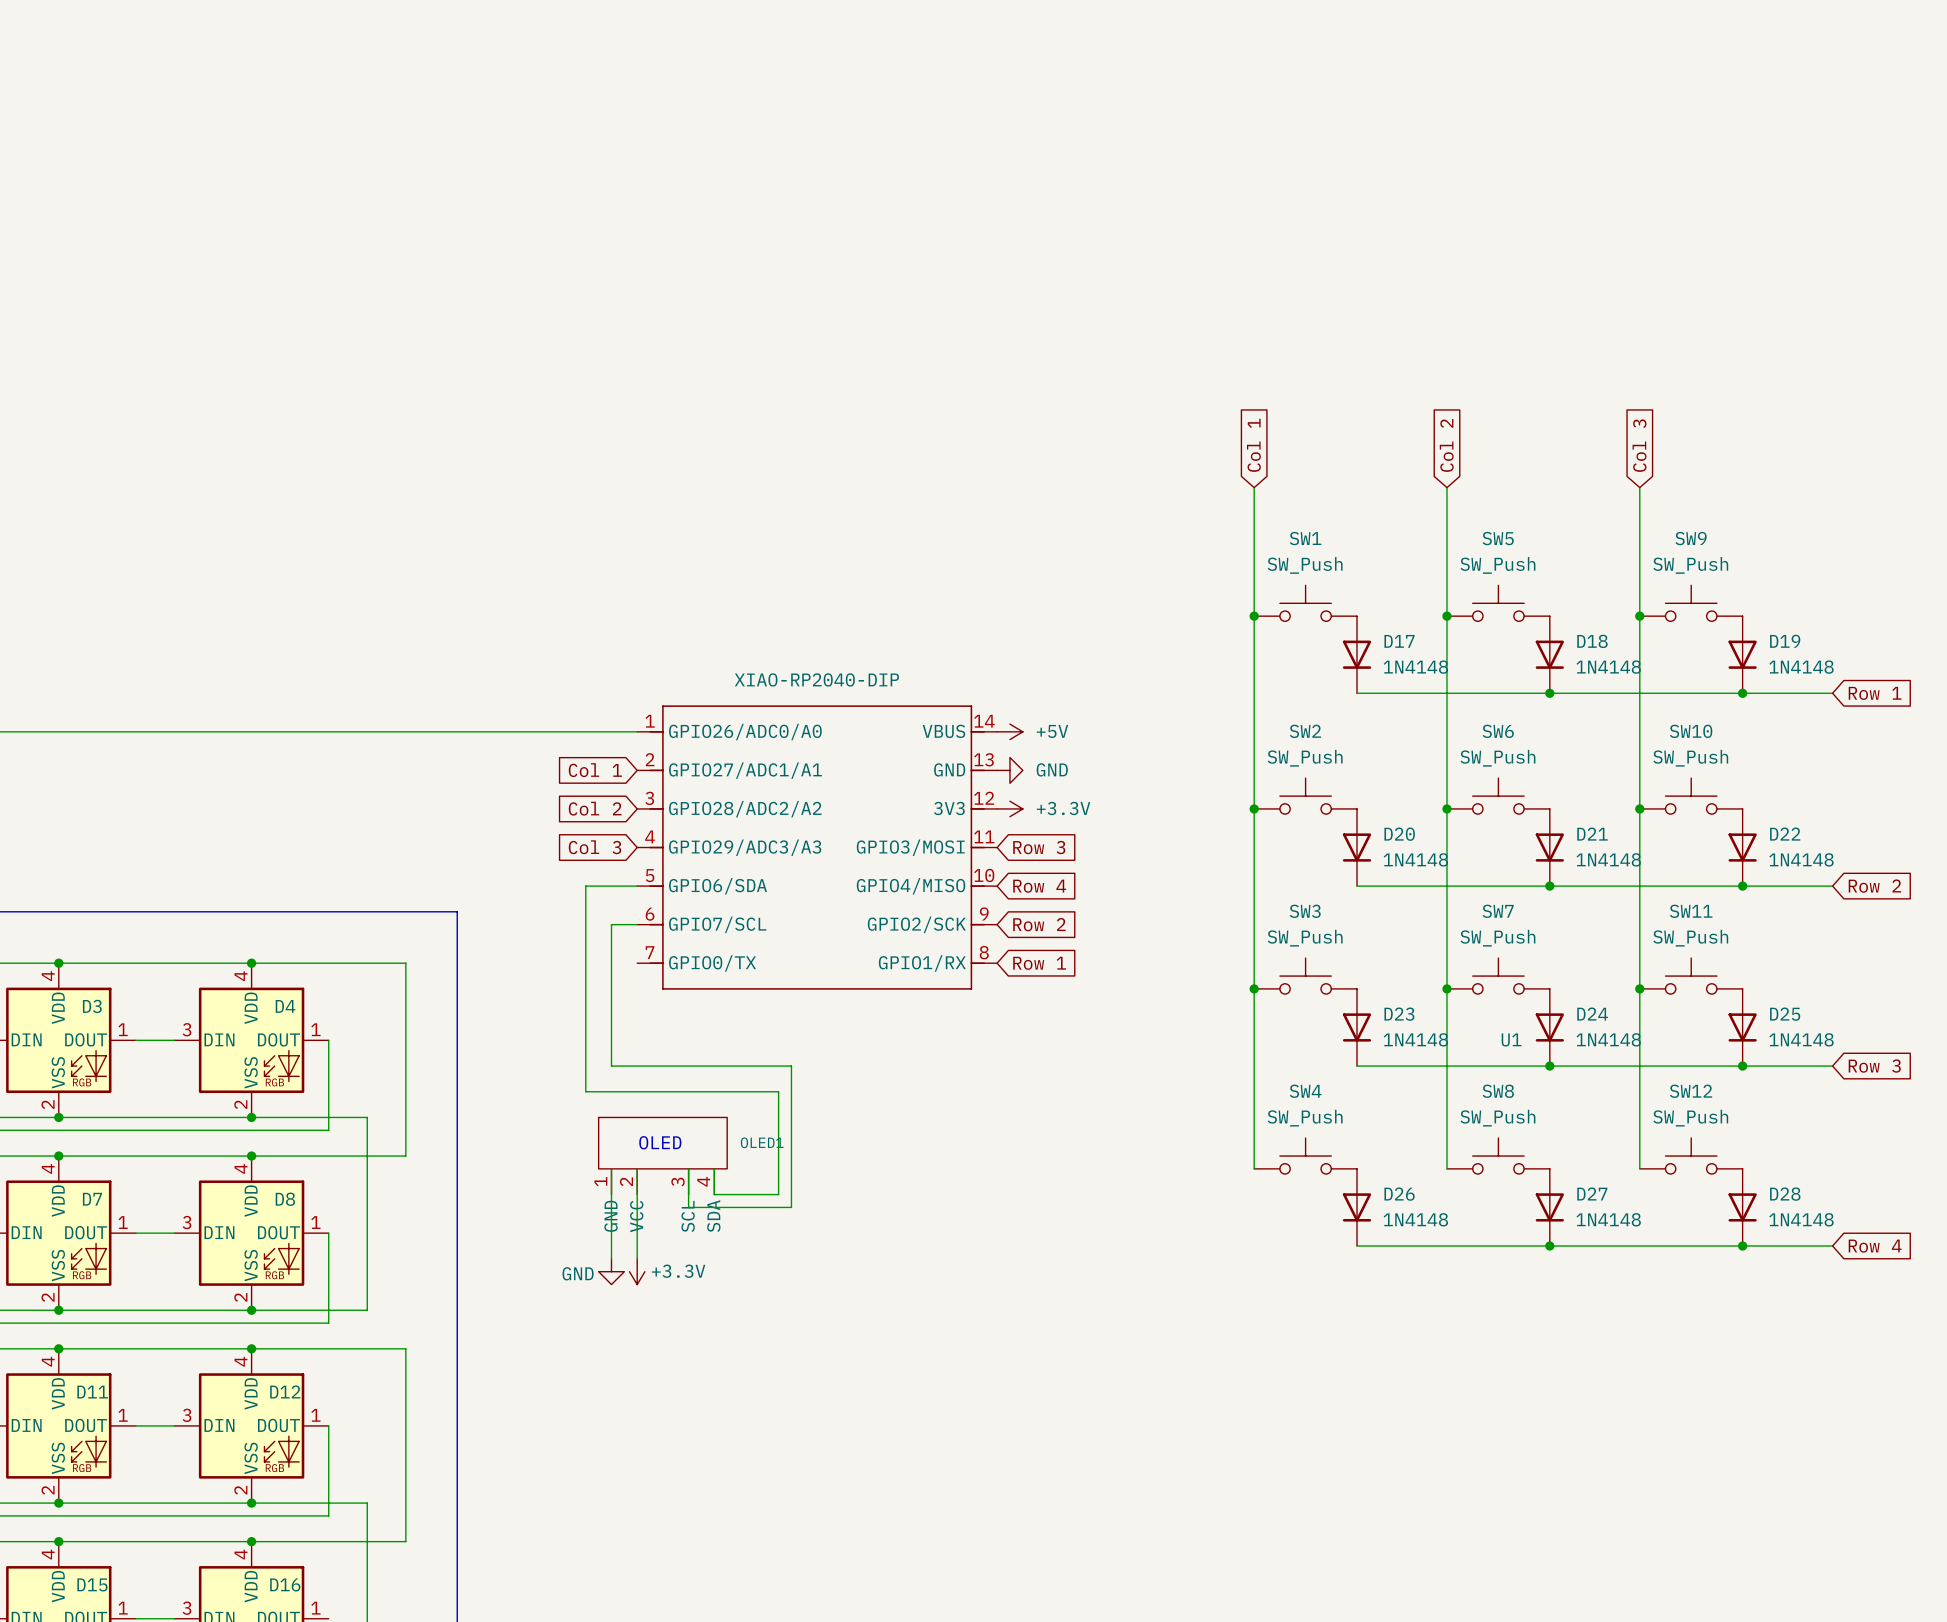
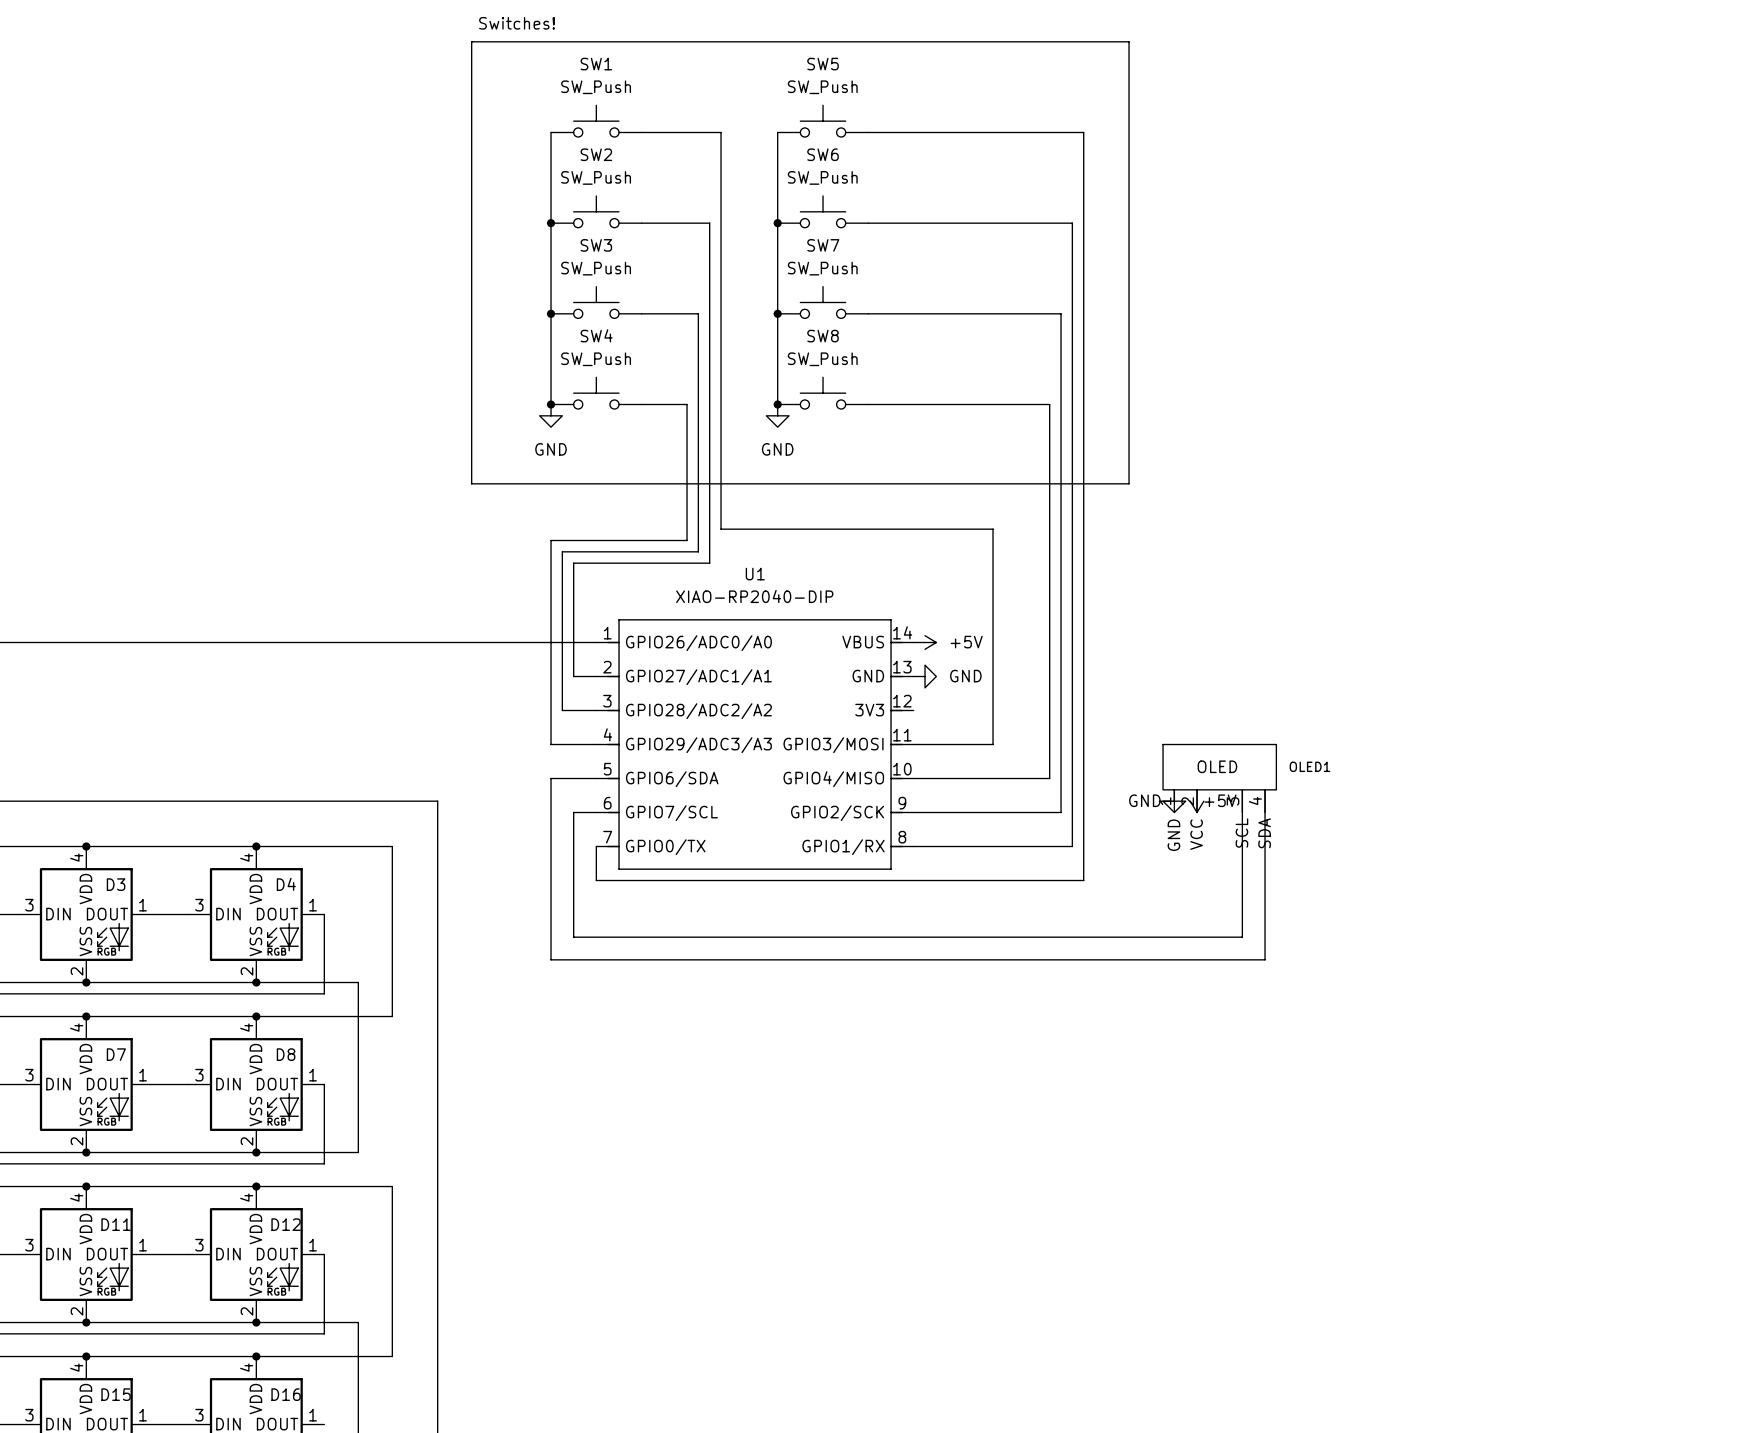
text: none -> Switches! (517, 23)
line: none -> (471, 41) (1129, 41) (1129, 483) (471, 483) (471, 41)
wire: none -> (551, 132) (551, 404)
wire: none -> (641, 132) (721, 132) (721, 529) (993, 529) (993, 744) (913, 744)
wire: none -> (777, 132) (777, 404)
wire: none -> (868, 132) (1083, 132) (1083, 880) (596, 880) (596, 846)
junction: none -> (551, 223)
wire: none -> (641, 223) (709, 223) (709, 563) (573, 563) (573, 676) (596, 676)
junction: none -> (777, 223)
wire: none -> (868, 223) (1072, 223) (1072, 846) (913, 846)
junction: none -> (551, 313)
wire: none -> (641, 313) (698, 313) (698, 551) (562, 551) (562, 710) (596, 710)
junction: none -> (777, 313)
wire: none -> (868, 313) (1061, 313) (1061, 812) (913, 812)
global label: Col 1 (1253, 445) -> none
global label: Col 2 (1446, 445) -> none
global label: Col 3 (1639, 445) -> none
junction: none -> (551, 404)
wire: none -> (641, 404) (687, 404) (687, 540) (551, 540) (551, 744) (596, 744)
junction: none -> (777, 404)
wire: none -> (868, 404) (1049, 404) (1049, 778) (913, 778)
power symbol: none -> GND (551, 415)
power symbol: none -> GND (777, 415)
wire: (1254, 487) (1254, 1168) -> none
wire: (1446, 487) (1446, 1168) -> none
wire: (1639, 487) (1639, 1168) -> none
SW1 position: (1305, 603) -> (596, 121)
SW5 position: (1498, 603) -> (823, 121)
SW9: SW_Push (1691, 603) -> none
junction: (1254, 616) -> none
junction: (1446, 616) -> none
junction: (1639, 616) -> none
D17: 1N4148 (1357, 654) -> none
D18: 1N4148 (1549, 654) -> none
D19: 1N4148 (1742, 654) -> none
wire: (1357, 693) (1832, 693) -> none
junction: (1549, 693) -> none
junction: (1742, 693) -> none
global label: Row 1 (1875, 693) -> none
global label: Col 1 (595, 770) -> none
SW2 position: (1305, 796) -> (596, 211)
SW6 position: (1498, 796) -> (823, 211)
SW10: SW_Push (1691, 796) -> none
global label: Col 2 (595, 808) -> none
power symbol: +3.3V (1009, 808) -> none
junction: (1254, 808) -> none
junction: (1446, 808) -> none
junction: (1639, 808) -> none
global label: Col 3 (595, 847) -> none
global label: Row 3 (1039, 847) -> none
D20: 1N4148 (1357, 847) -> none
D21: 1N4148 (1549, 847) -> none
D22: 1N4148 (1742, 847) -> none
text: none -> OLED (1217, 766)
global label: Row 4 (1039, 886) -> none
wire: (1357, 886) (1832, 886) -> none
junction: (1549, 886) -> none
junction: (1742, 886) -> none
global label: Row 2 (1874, 886) -> none
power symbol: none -> GND (1174, 801)
power symbol: none -> +5V (1197, 801)
global label: Row 2 (1039, 924) -> none
global label: Row 1 (1039, 963) -> none
SW3 position: (1305, 976) -> (596, 302)
SW7 position: (1498, 976) -> (823, 302)
SW11: SW_Push (1691, 976) -> none
junction: (1254, 988) -> none
junction: (1446, 988) -> none
junction: (1639, 988) -> none
D23: 1N4148 (1357, 1027) -> none
D24: 1N4148 (1549, 1027) -> none
D25: 1N4148 (1742, 1027) -> none
U1 name position: U1 (1511, 1039) -> U1 (755, 574)
wire: (791, 1066) (791, 1207) (688, 1207) (688, 1168) -> (732, 937) (1231, 937)
wire: (1369, 1066) (1832, 1066) -> (1242, 937) (1242, 789)
junction: (1549, 1066) -> none
junction: (1742, 1066) -> none
global label: Row 3 (1874, 1066) -> none
wire: (778, 1091) (778, 1194) (714, 1194) (714, 1168) -> (721, 959) (1265, 959) (1265, 789)
text: OLED (660, 1142) -> none
OLED1 position: (662, 1156) -> (1219, 778)
SW4 position: (1305, 1156) -> (596, 393)
SW8 position: (1498, 1156) -> (823, 393)
SW12: SW_Push (1691, 1156) -> none
wire: (611, 1168) (611, 1258) -> none
wire: (637, 1168) (637, 1258) -> none
D26: 1N4148 (1357, 1207) -> none
D27: 1N4148 (1549, 1207) -> none
D28: 1N4148 (1742, 1207) -> none
wire: (1357, 1245) (1832, 1245) -> none
junction: (1549, 1245) -> none
junction: (1742, 1245) -> none
global label: Row 4 (1875, 1246) -> none
power symbol: GND (611, 1271) -> none
power symbol: +3.3V (637, 1271) -> none

